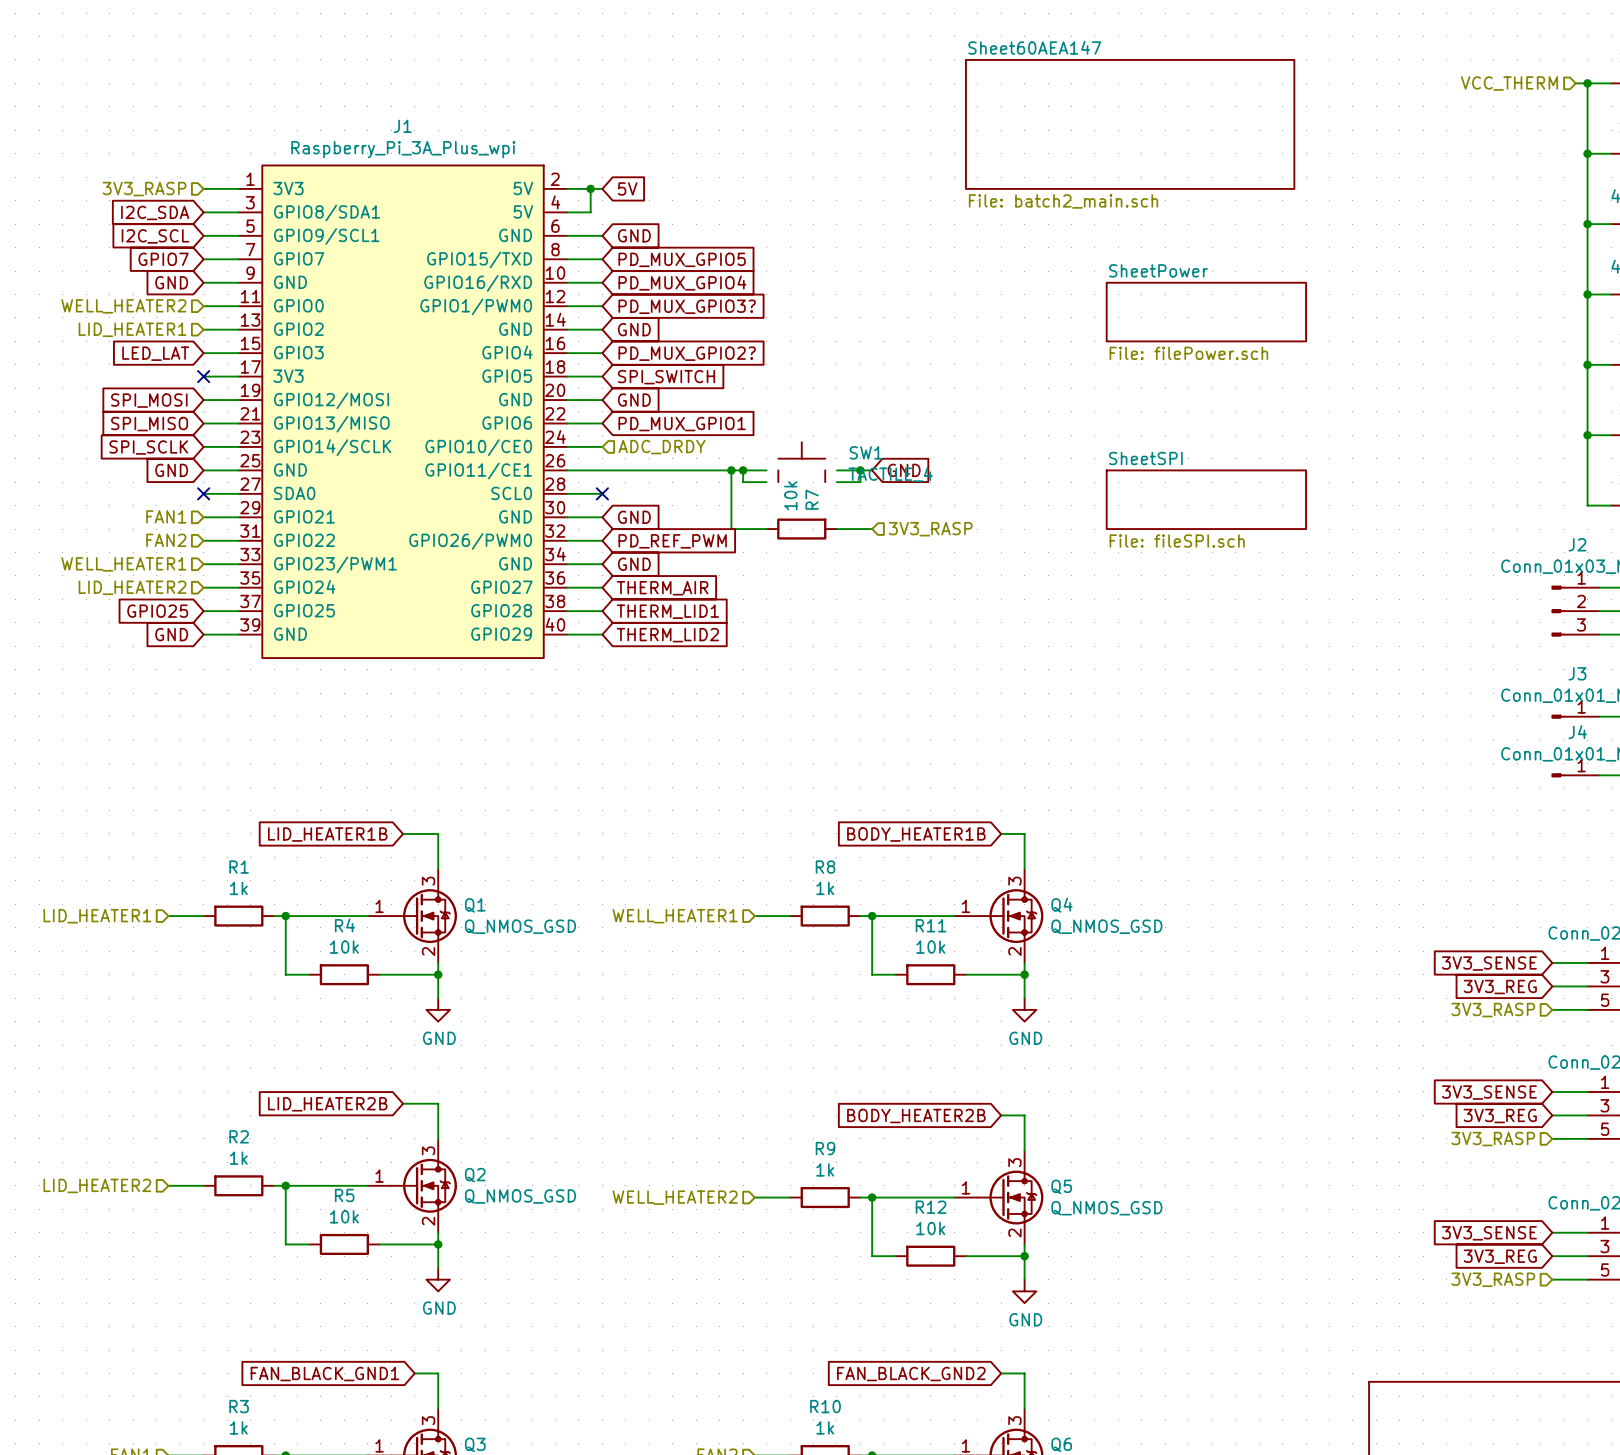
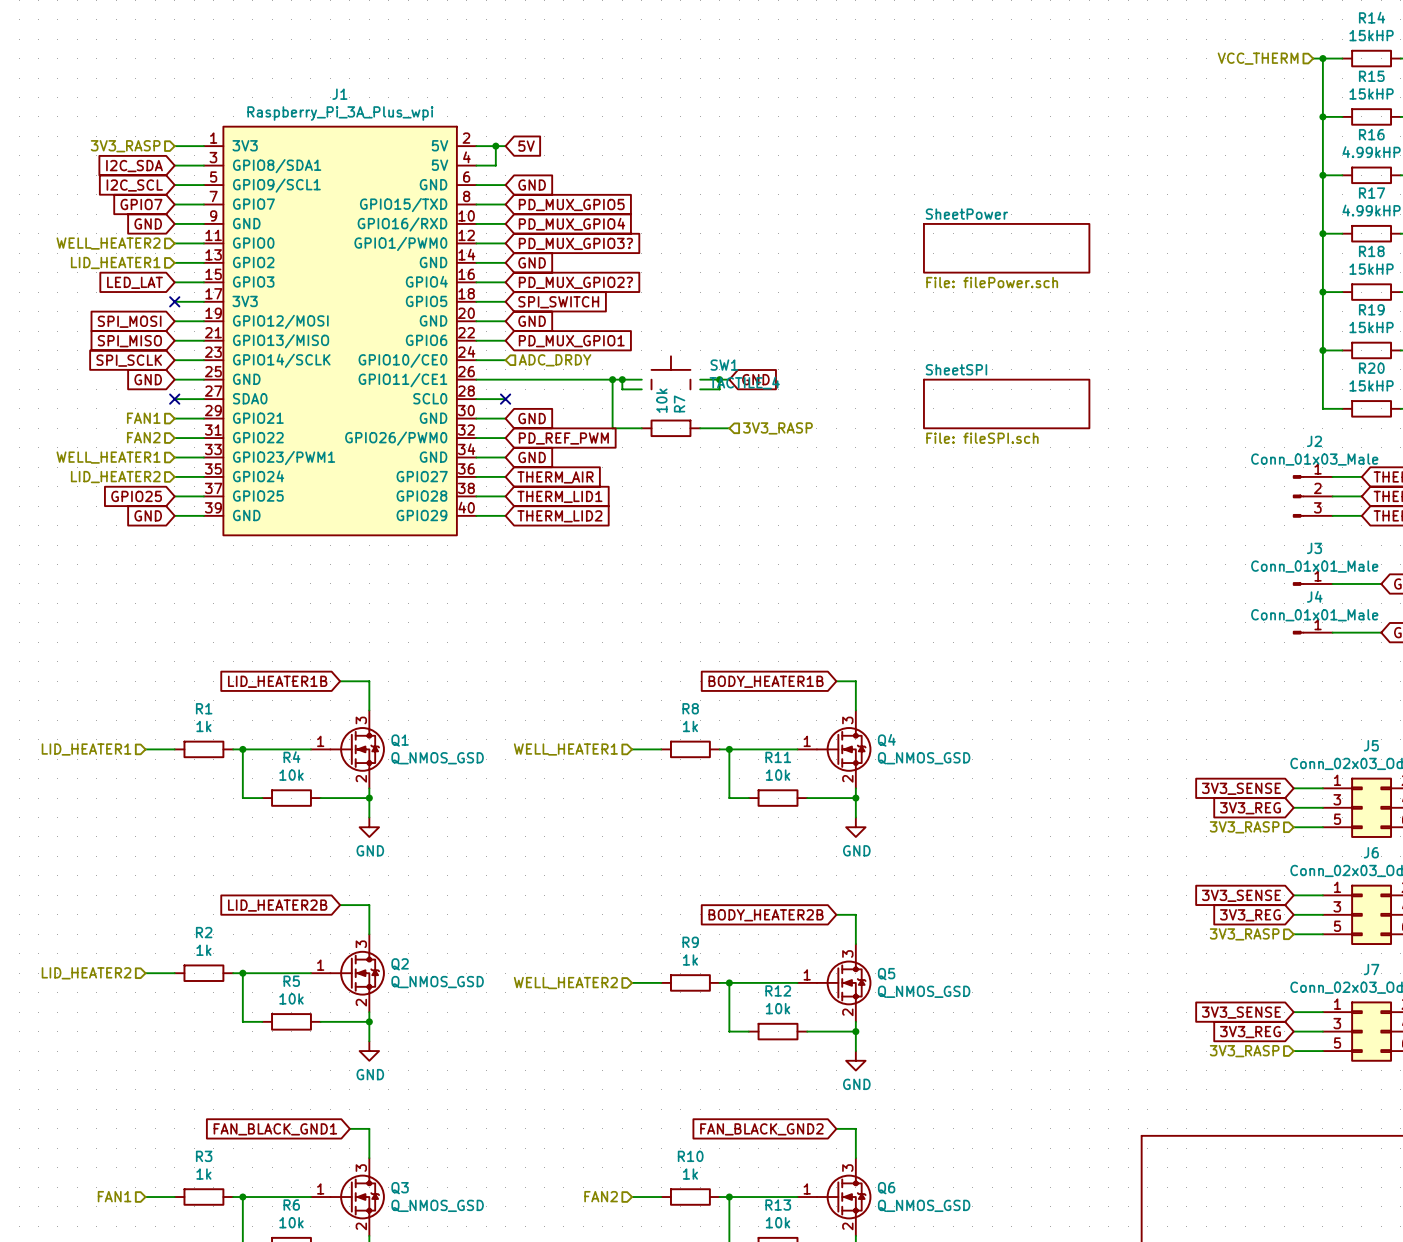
sheet Sheet60AEA147: File: batch2_main.sch (1130, 124) -> none

